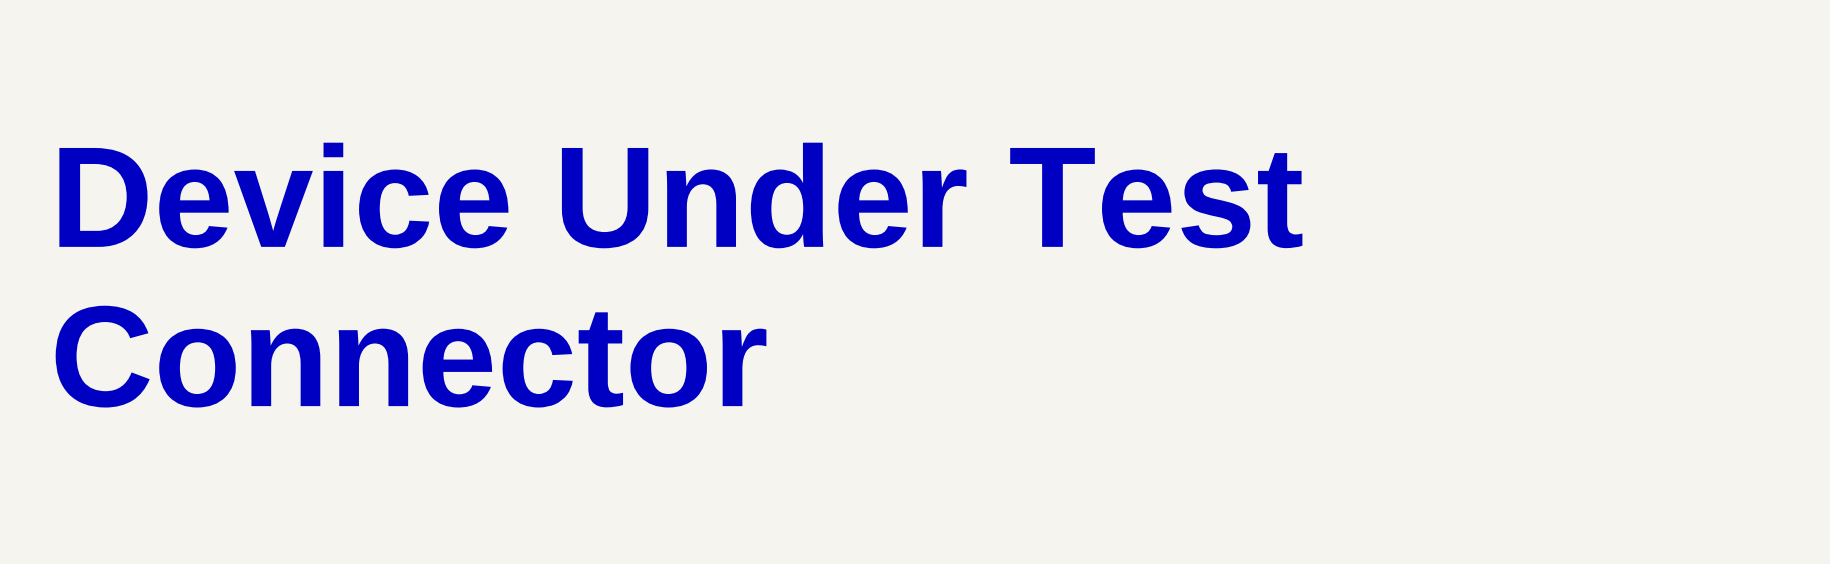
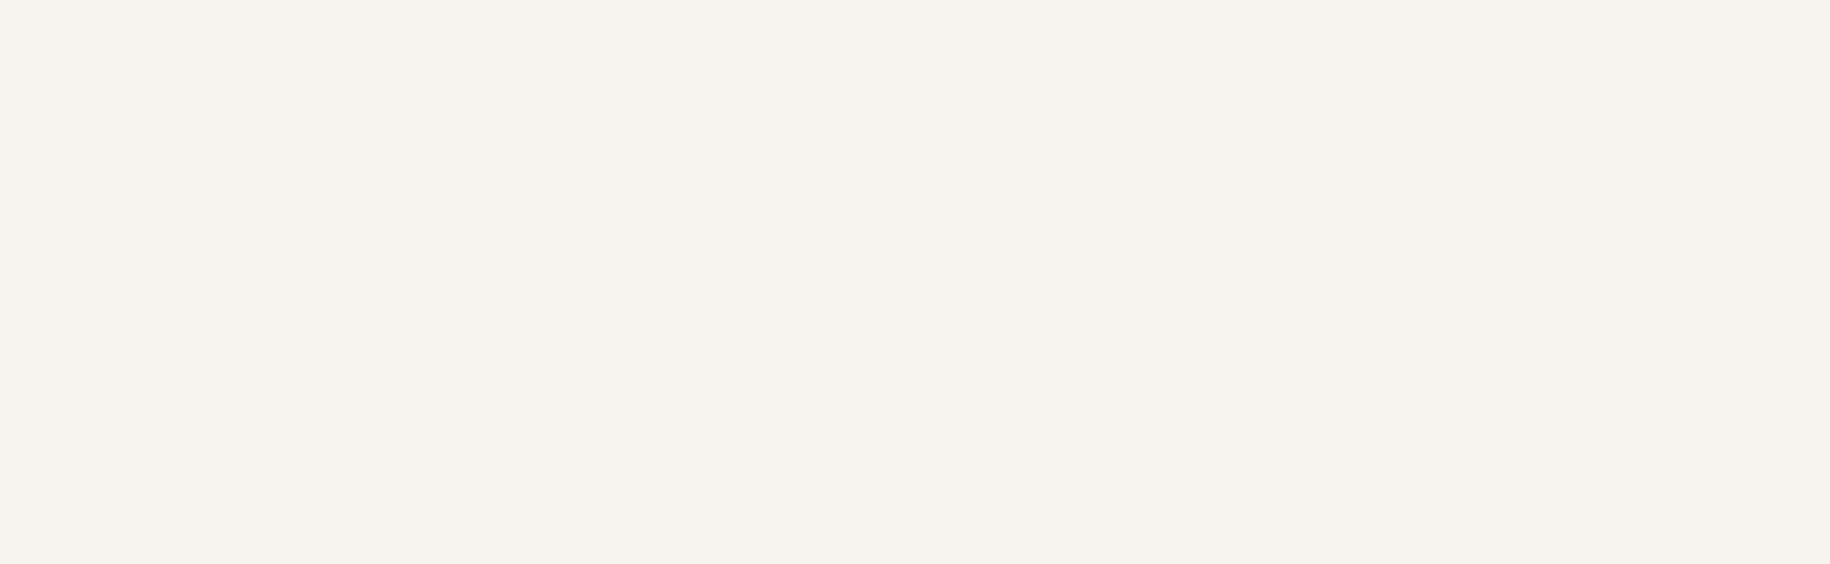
text: Device Under Test (680, 195) -> none
text: Connector (411, 356) -> none

